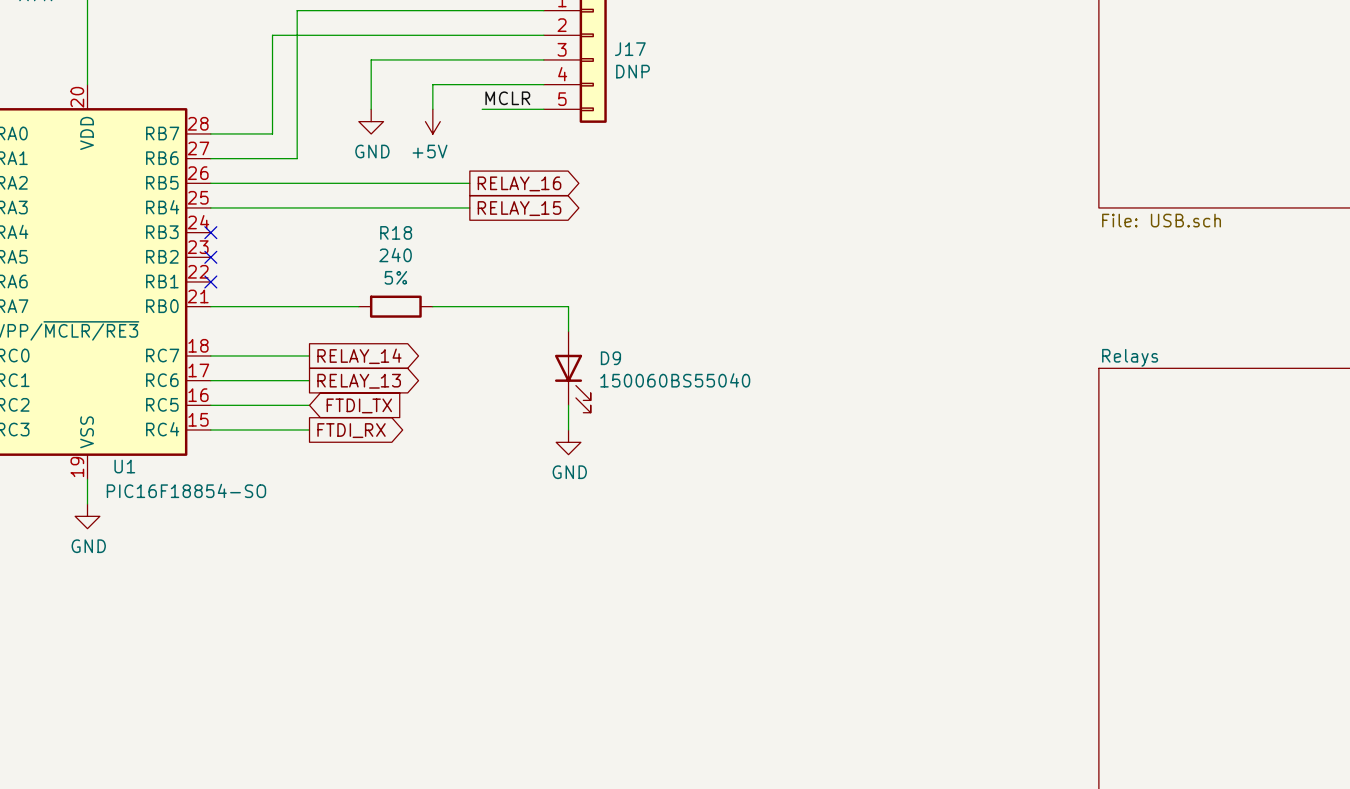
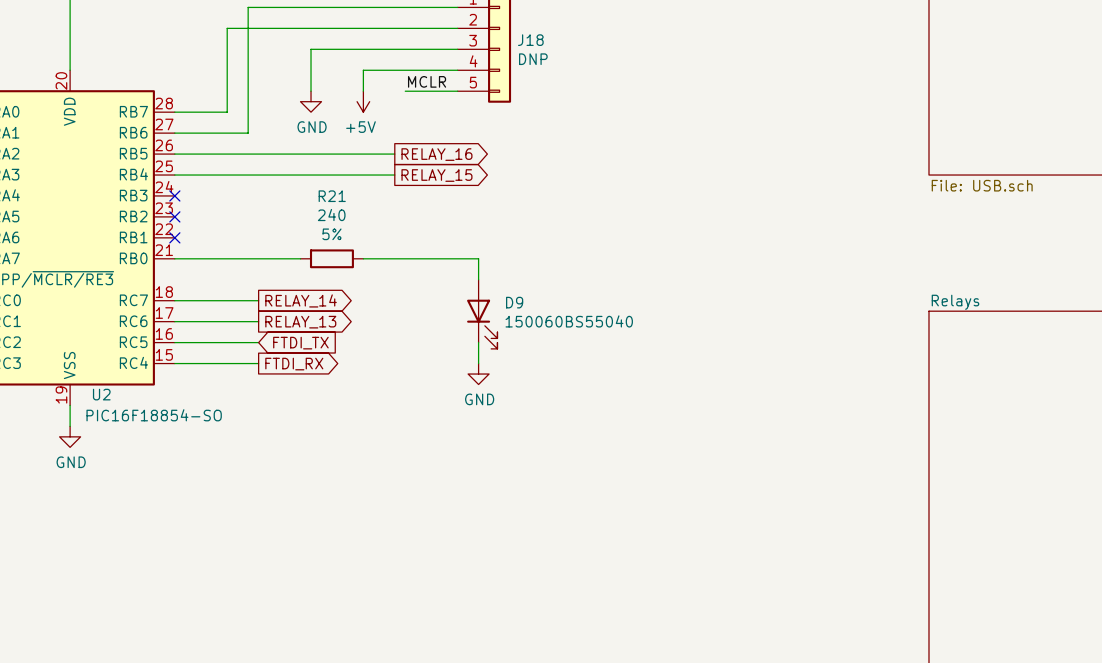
J17 name: J17 (630, 49) -> J18 (530, 40)
R18 name: R18 (396, 232) -> R21 (332, 196)
U1 name: U1 (124, 466) -> U2 (101, 394)

